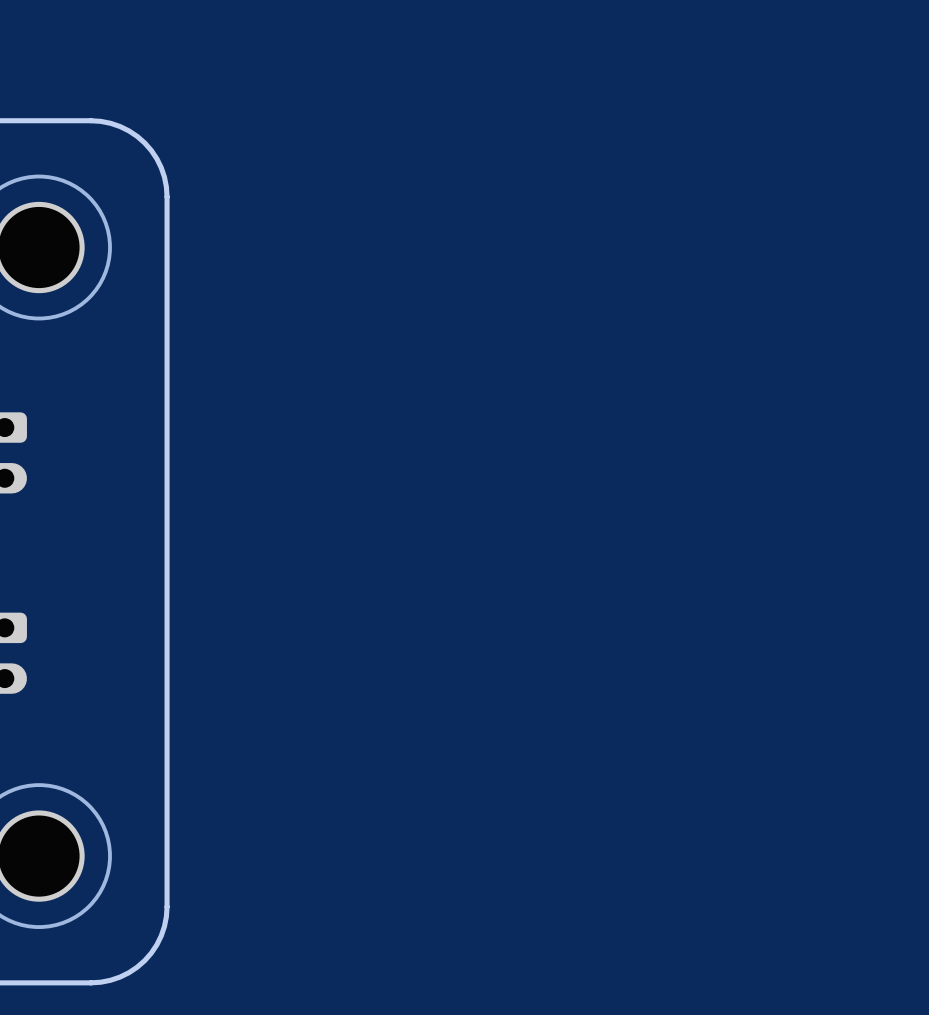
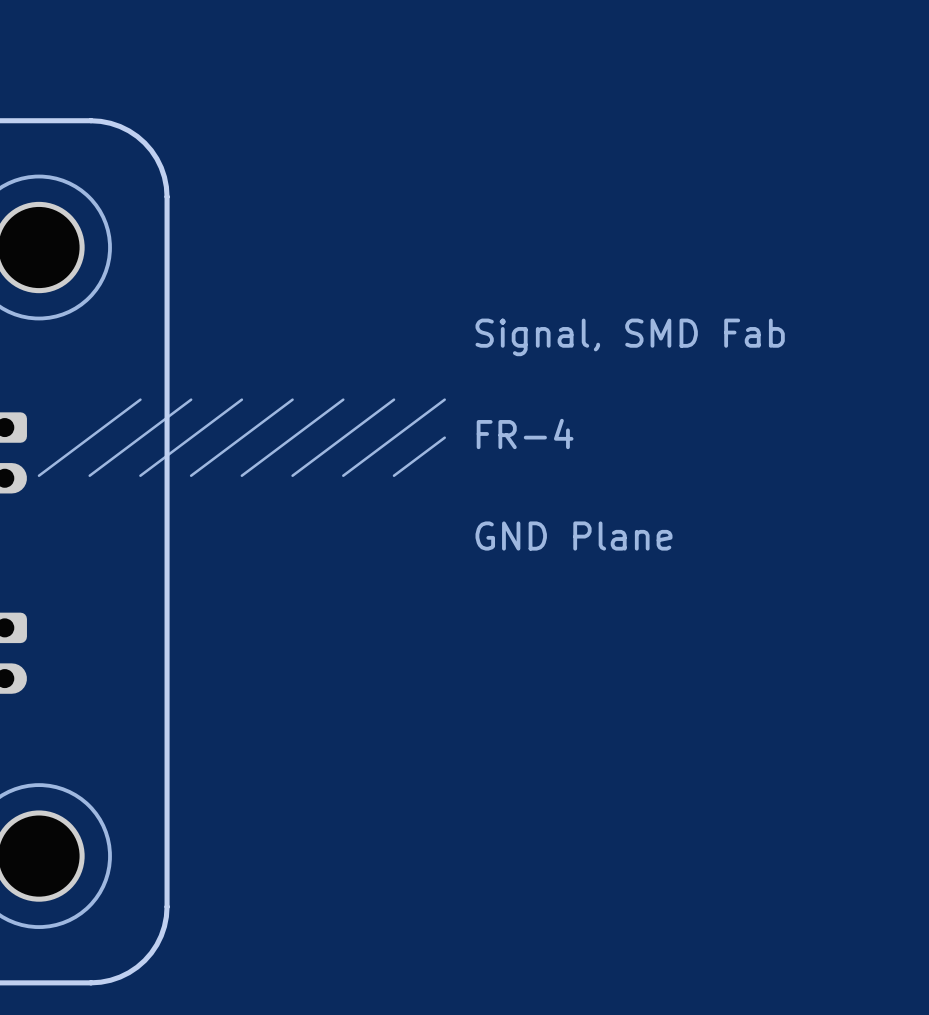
text: none -> Signal, SMD Fab (630, 337)
line: none -> (140, 399) (39, 475)
line: none -> (191, 399) (89, 475)
line: none -> (241, 399) (140, 475)
line: none -> (292, 399) (191, 475)
line: none -> (343, 399) (241, 475)
line: none -> (394, 399) (292, 475)
line: none -> (444, 399) (343, 475)
text: none -> FR-4 (525, 433)
line: none -> (444, 437) (394, 475)
text: none -> GND Plane (574, 536)

